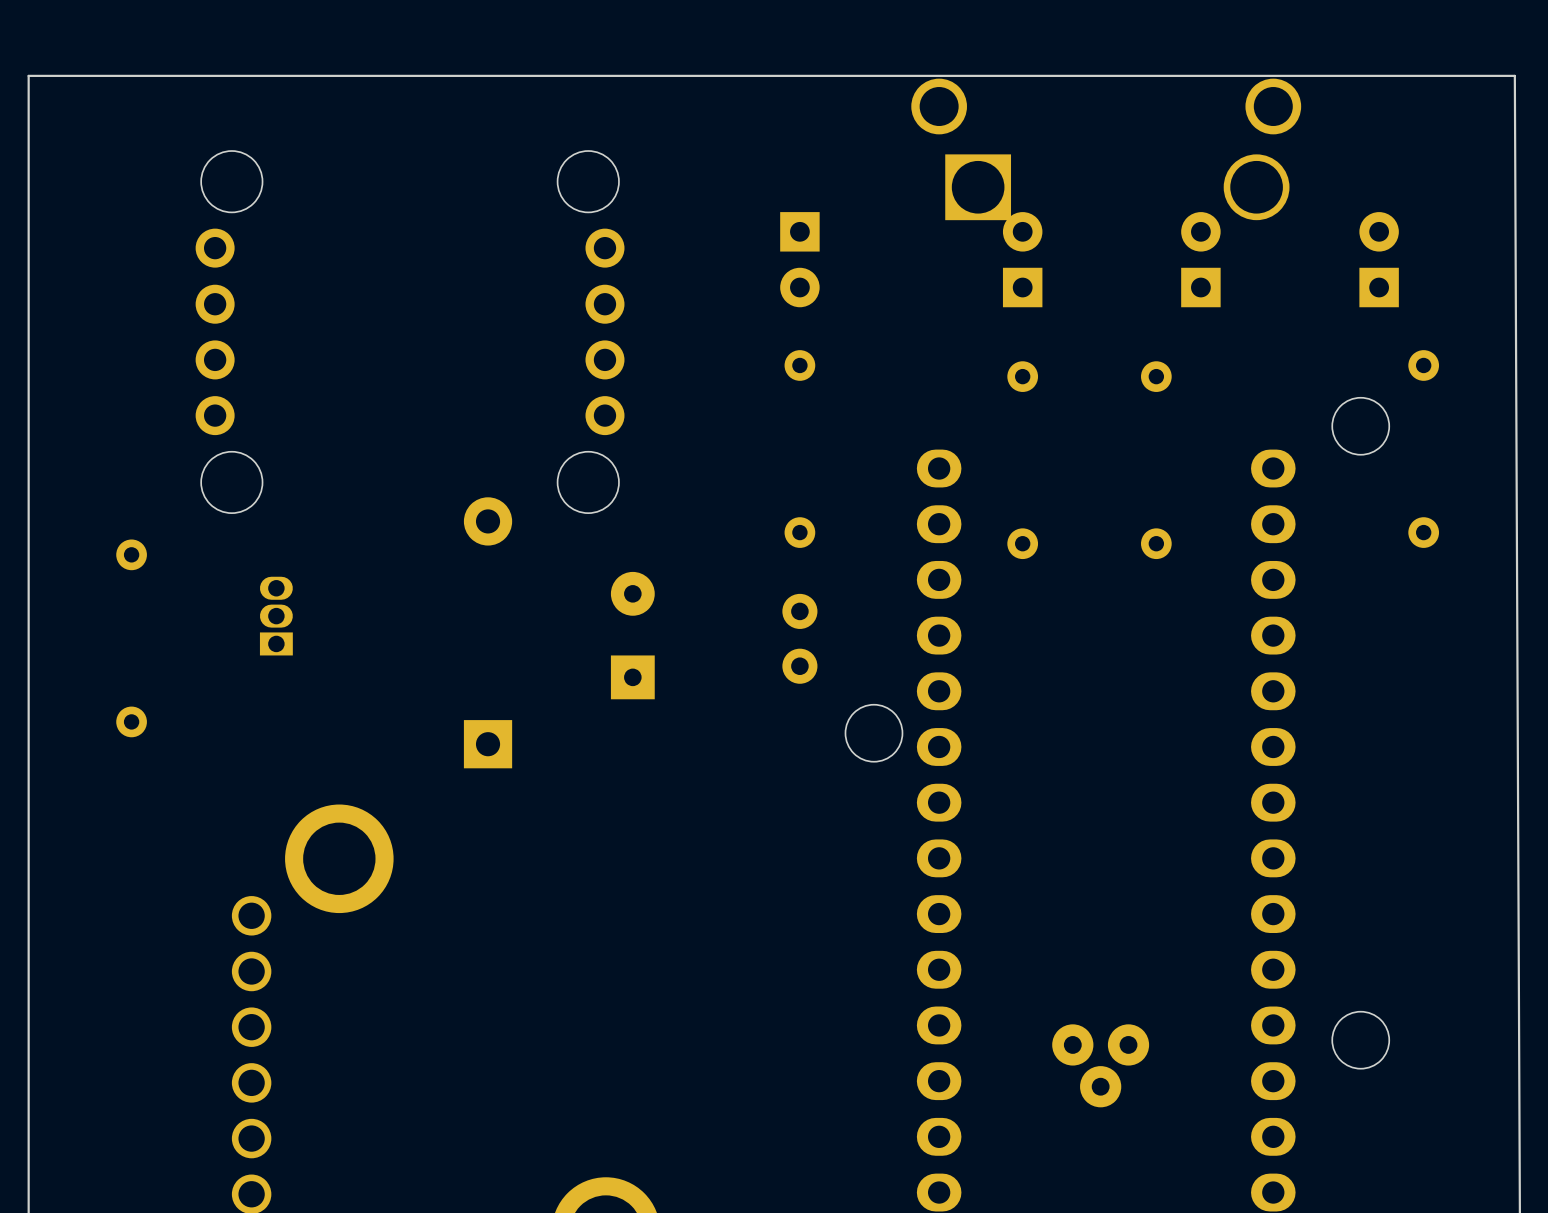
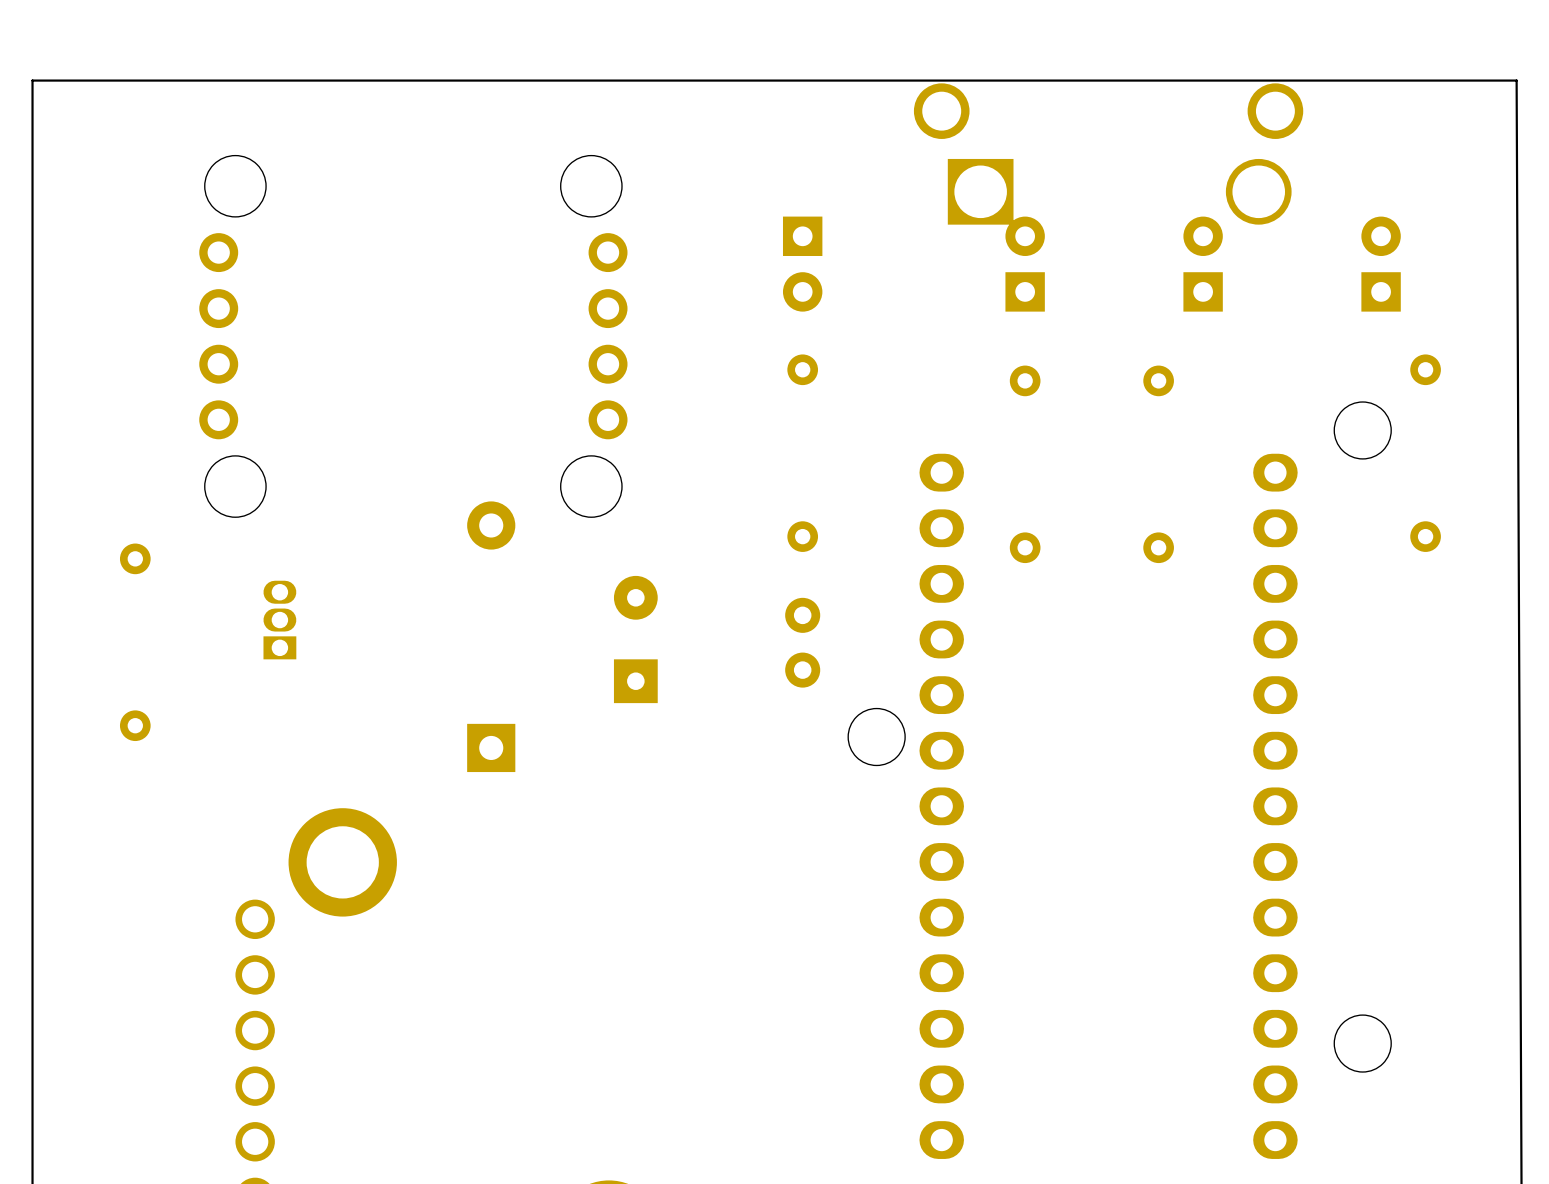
part: (1100, 1065) -> none

